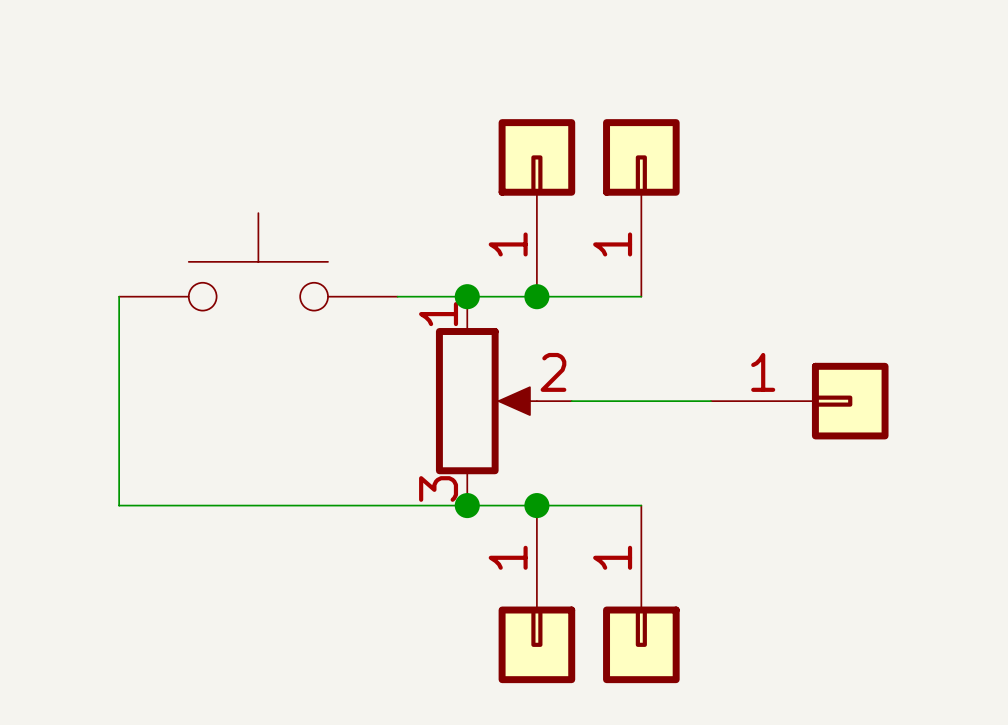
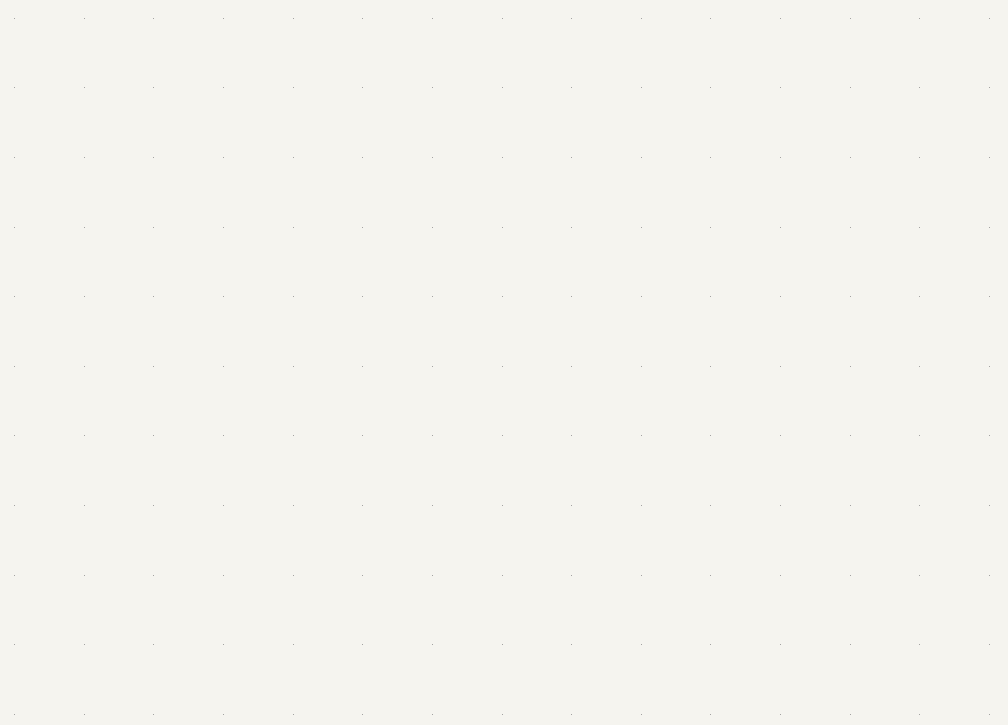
part: (536, 207) -> none
part: (641, 207) -> none
part: (258, 261) -> none
wire: (119, 296) (119, 505) (641, 505) -> none
wire: (397, 296) (641, 296) -> none
junction: (467, 296) -> none
junction: (536, 296) -> none
part: (503, 401) -> none
wire: (571, 401) (710, 401) -> none
part: (799, 401) -> none
junction: (467, 505) -> none
junction: (536, 505) -> none
part: (536, 594) -> none
part: (641, 594) -> none

